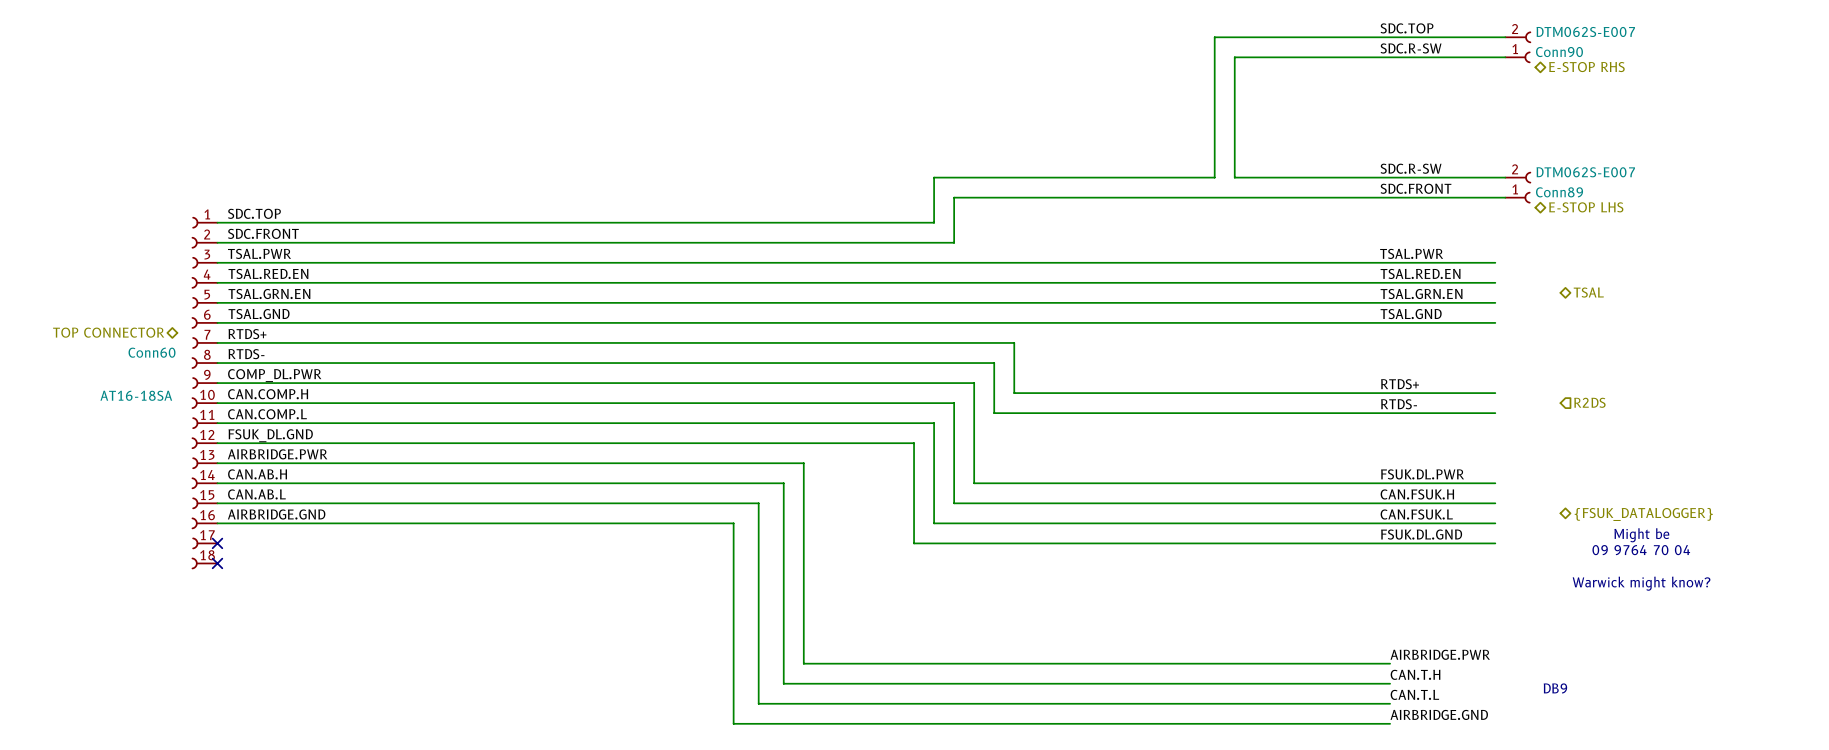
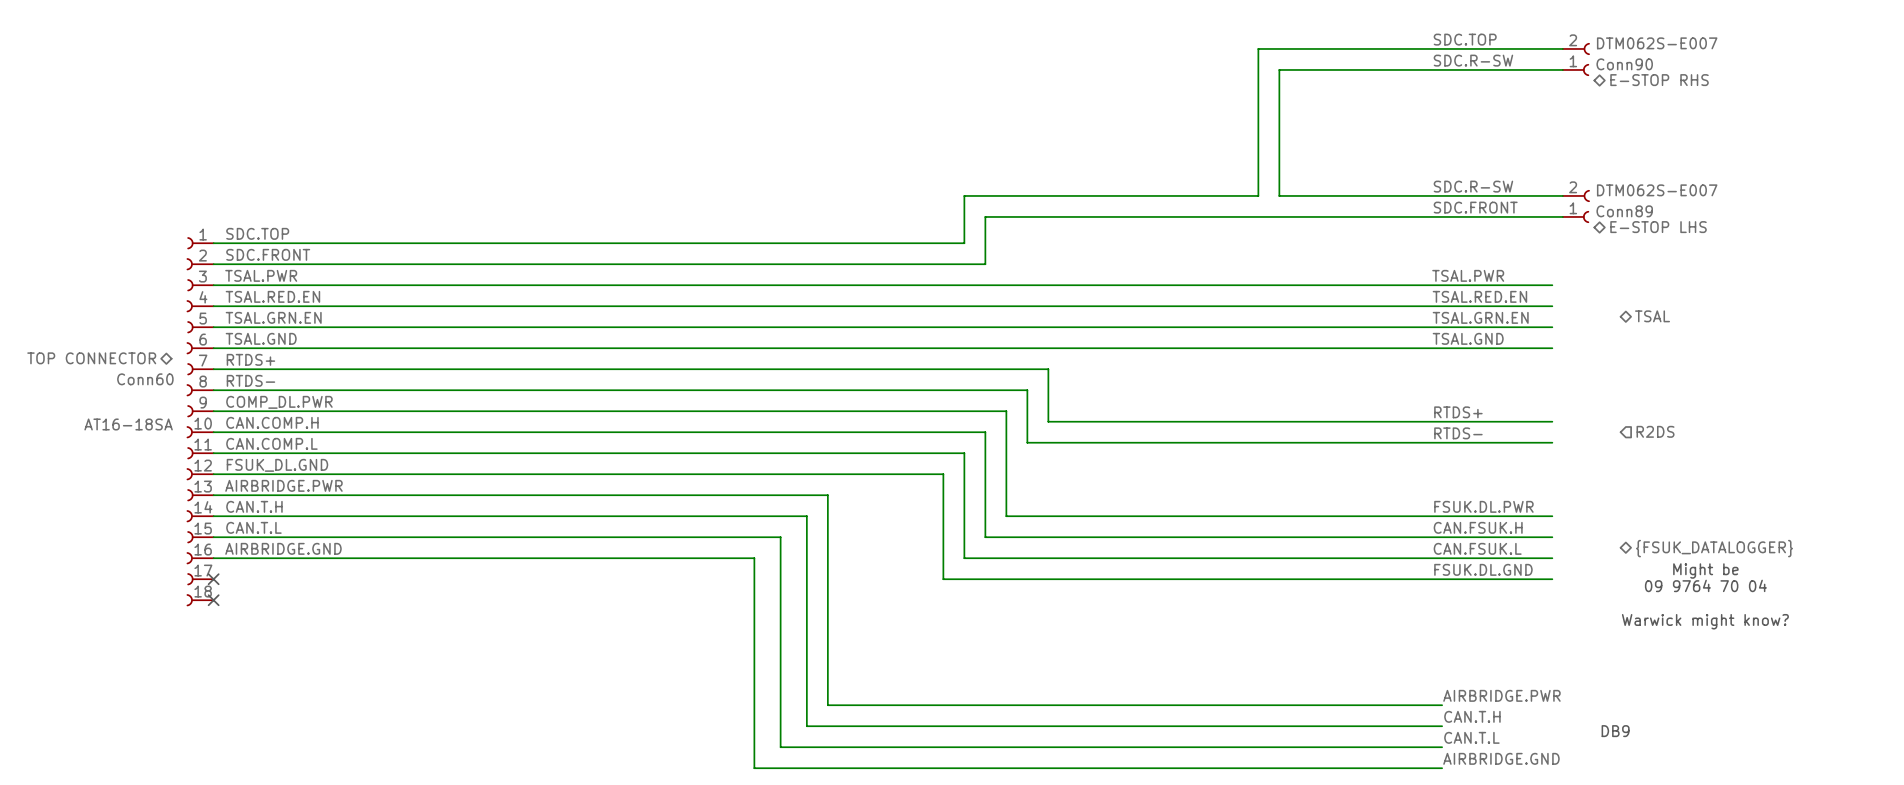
label: CAN.AB.H (257, 474) -> CAN.T.H (254, 506)
label: CAN.AB.L (256, 494) -> CAN.T.L (253, 527)

